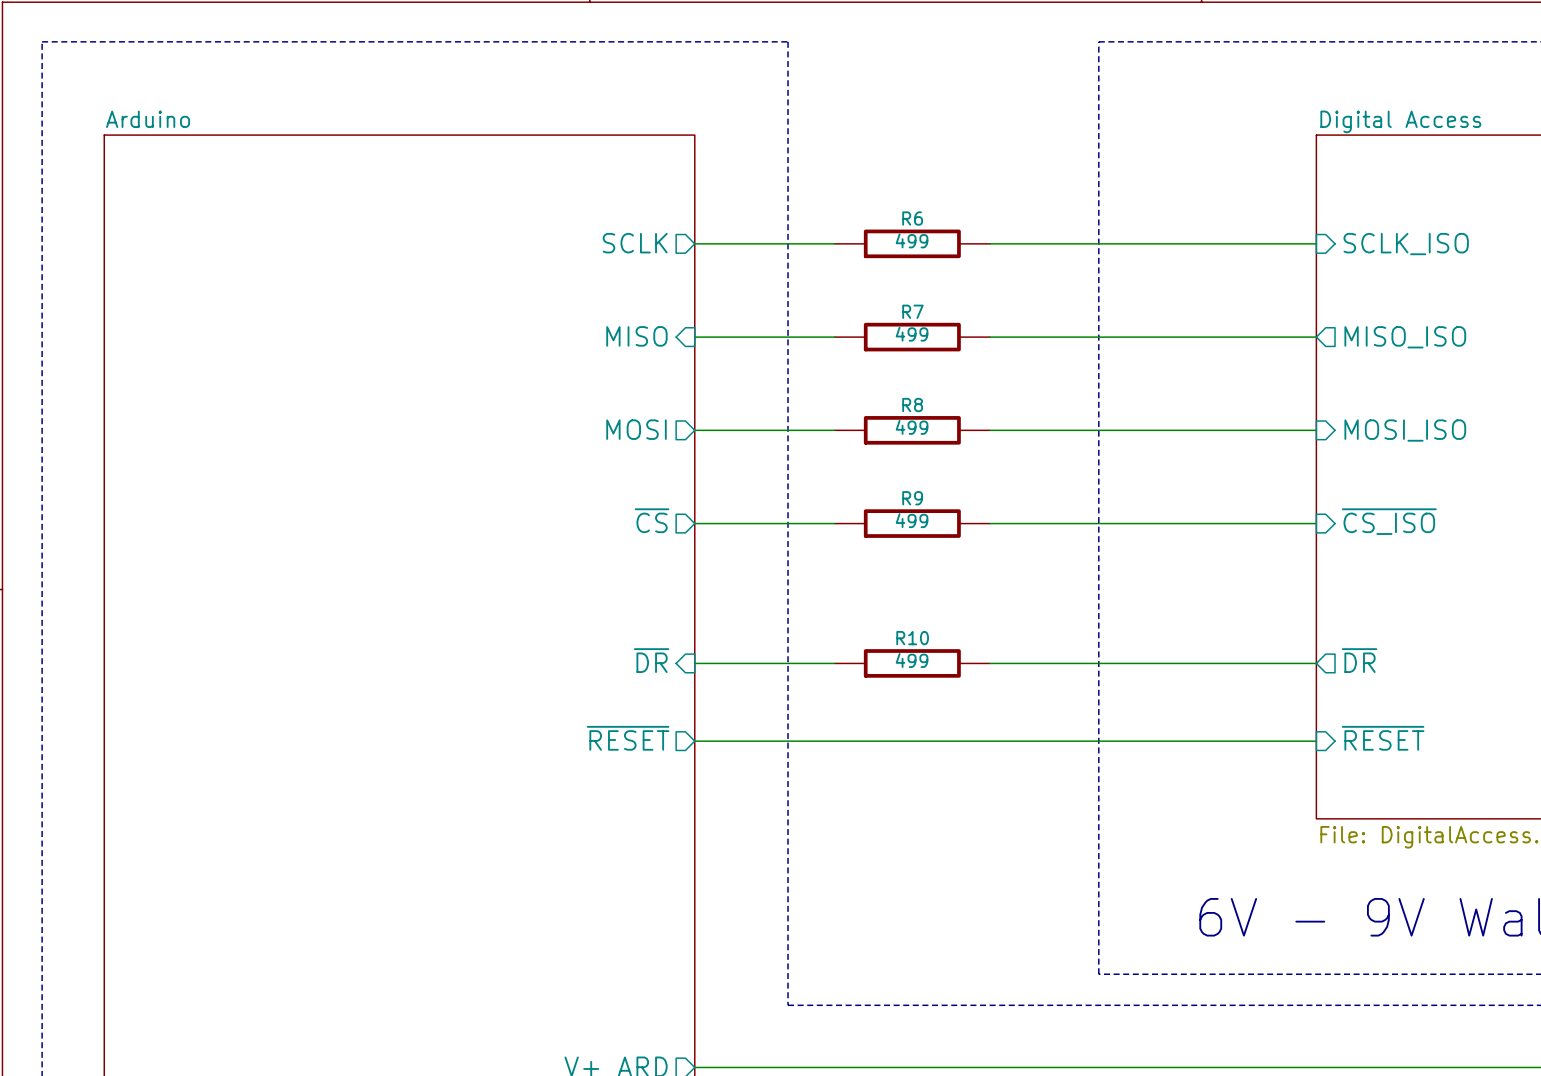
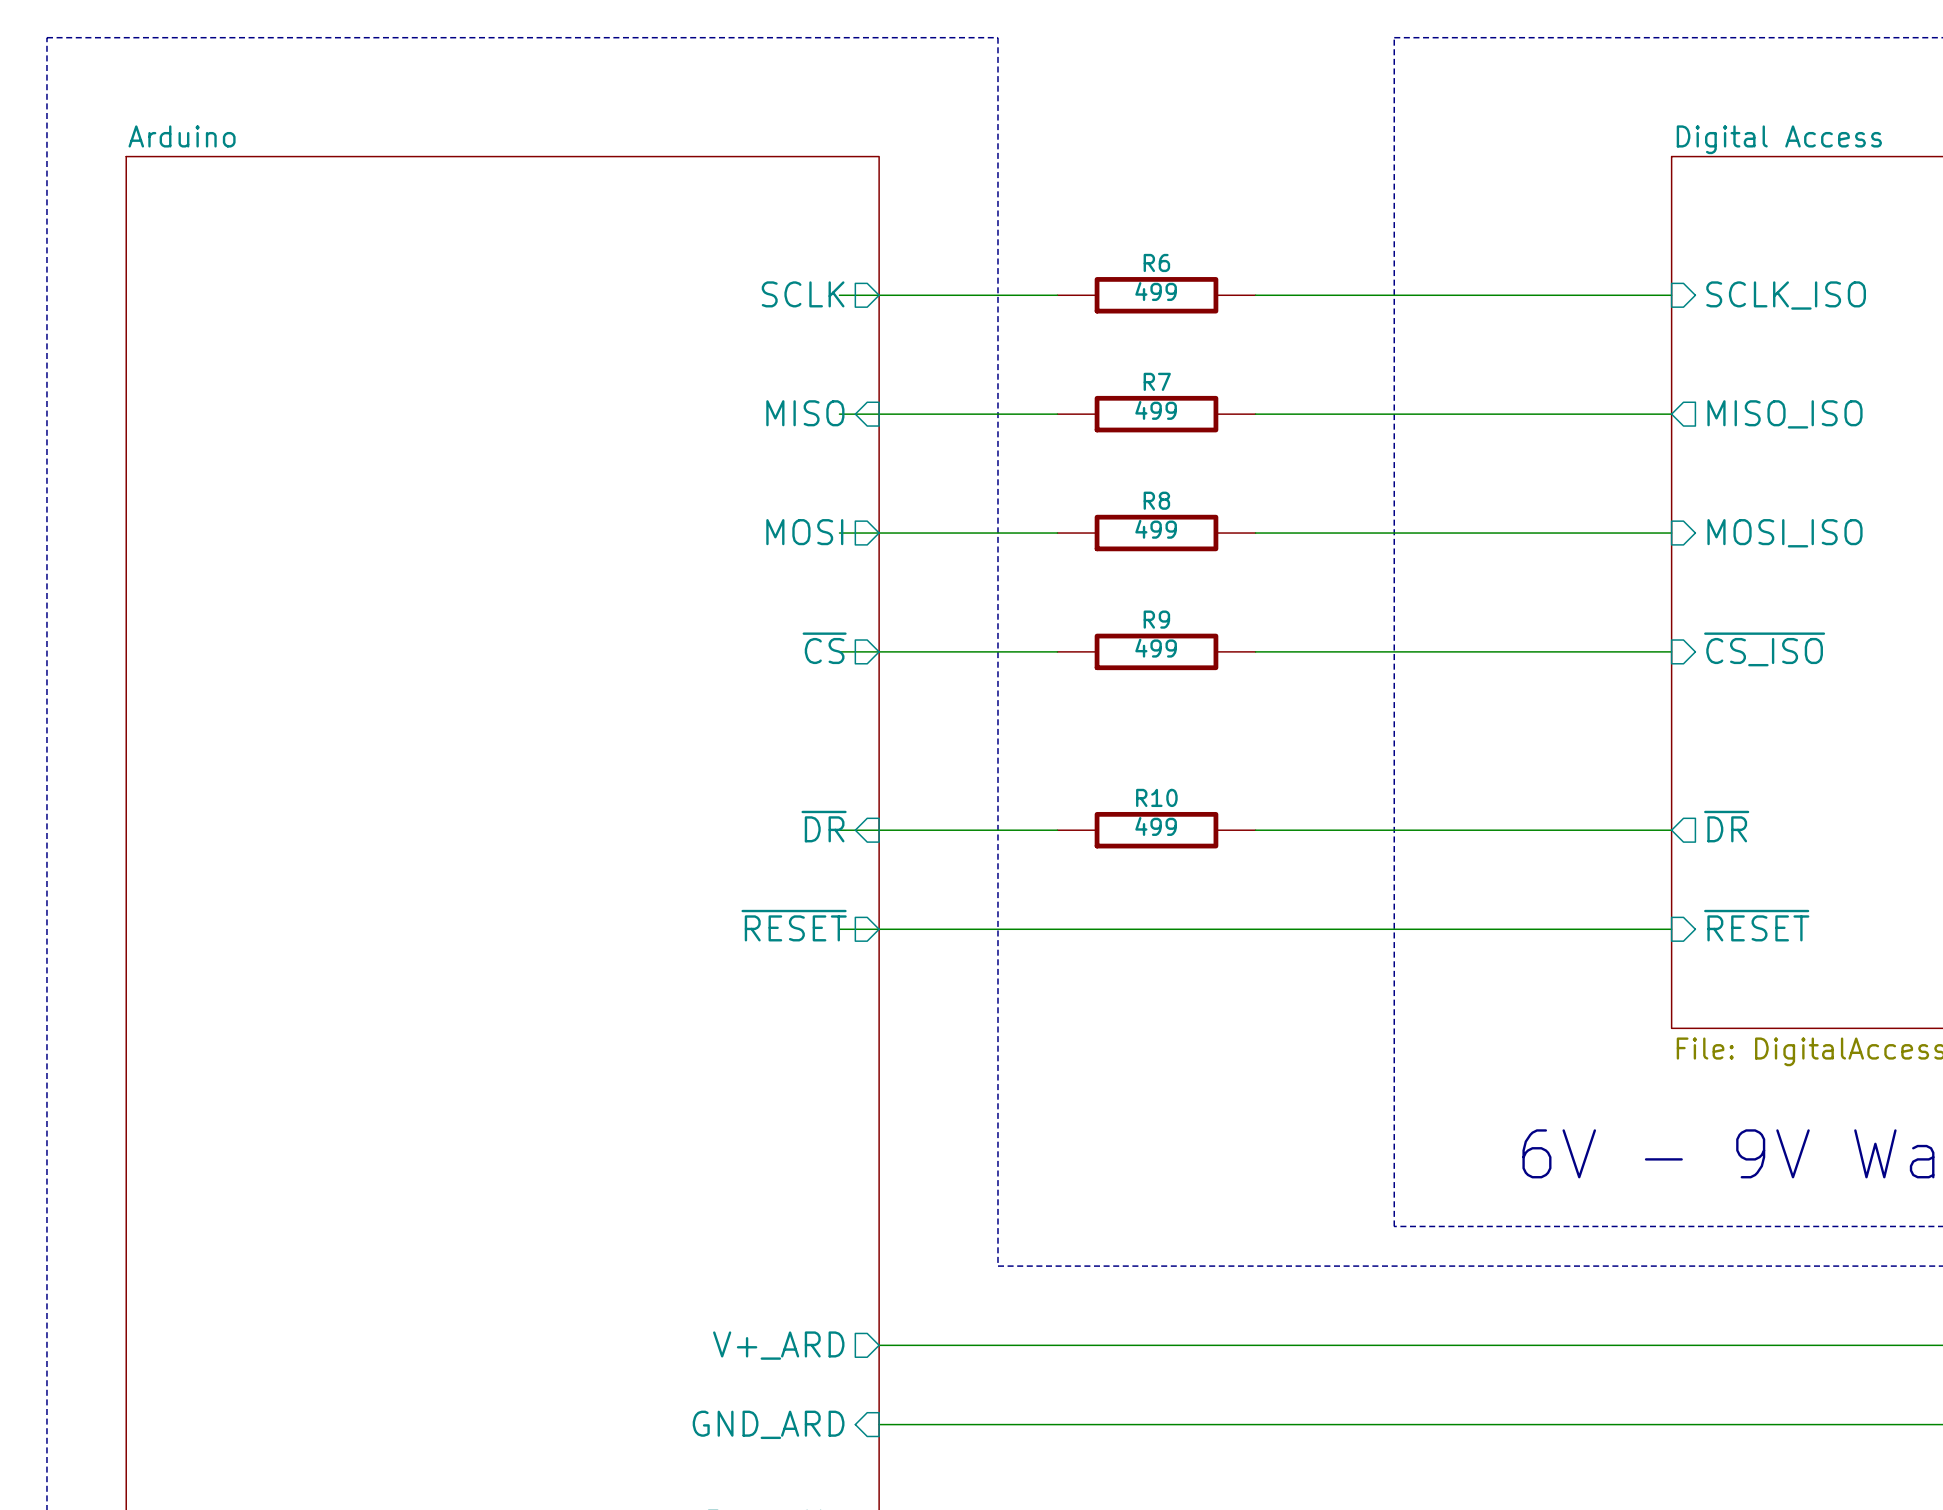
wire: none -> (839, 295) (879, 295)
wire: none -> (839, 414) (879, 414)
wire: none -> (839, 533) (879, 533)
wire: none -> (839, 651) (879, 651)
wire: none -> (839, 830) (879, 830)
wire: none -> (839, 929) (879, 929)

